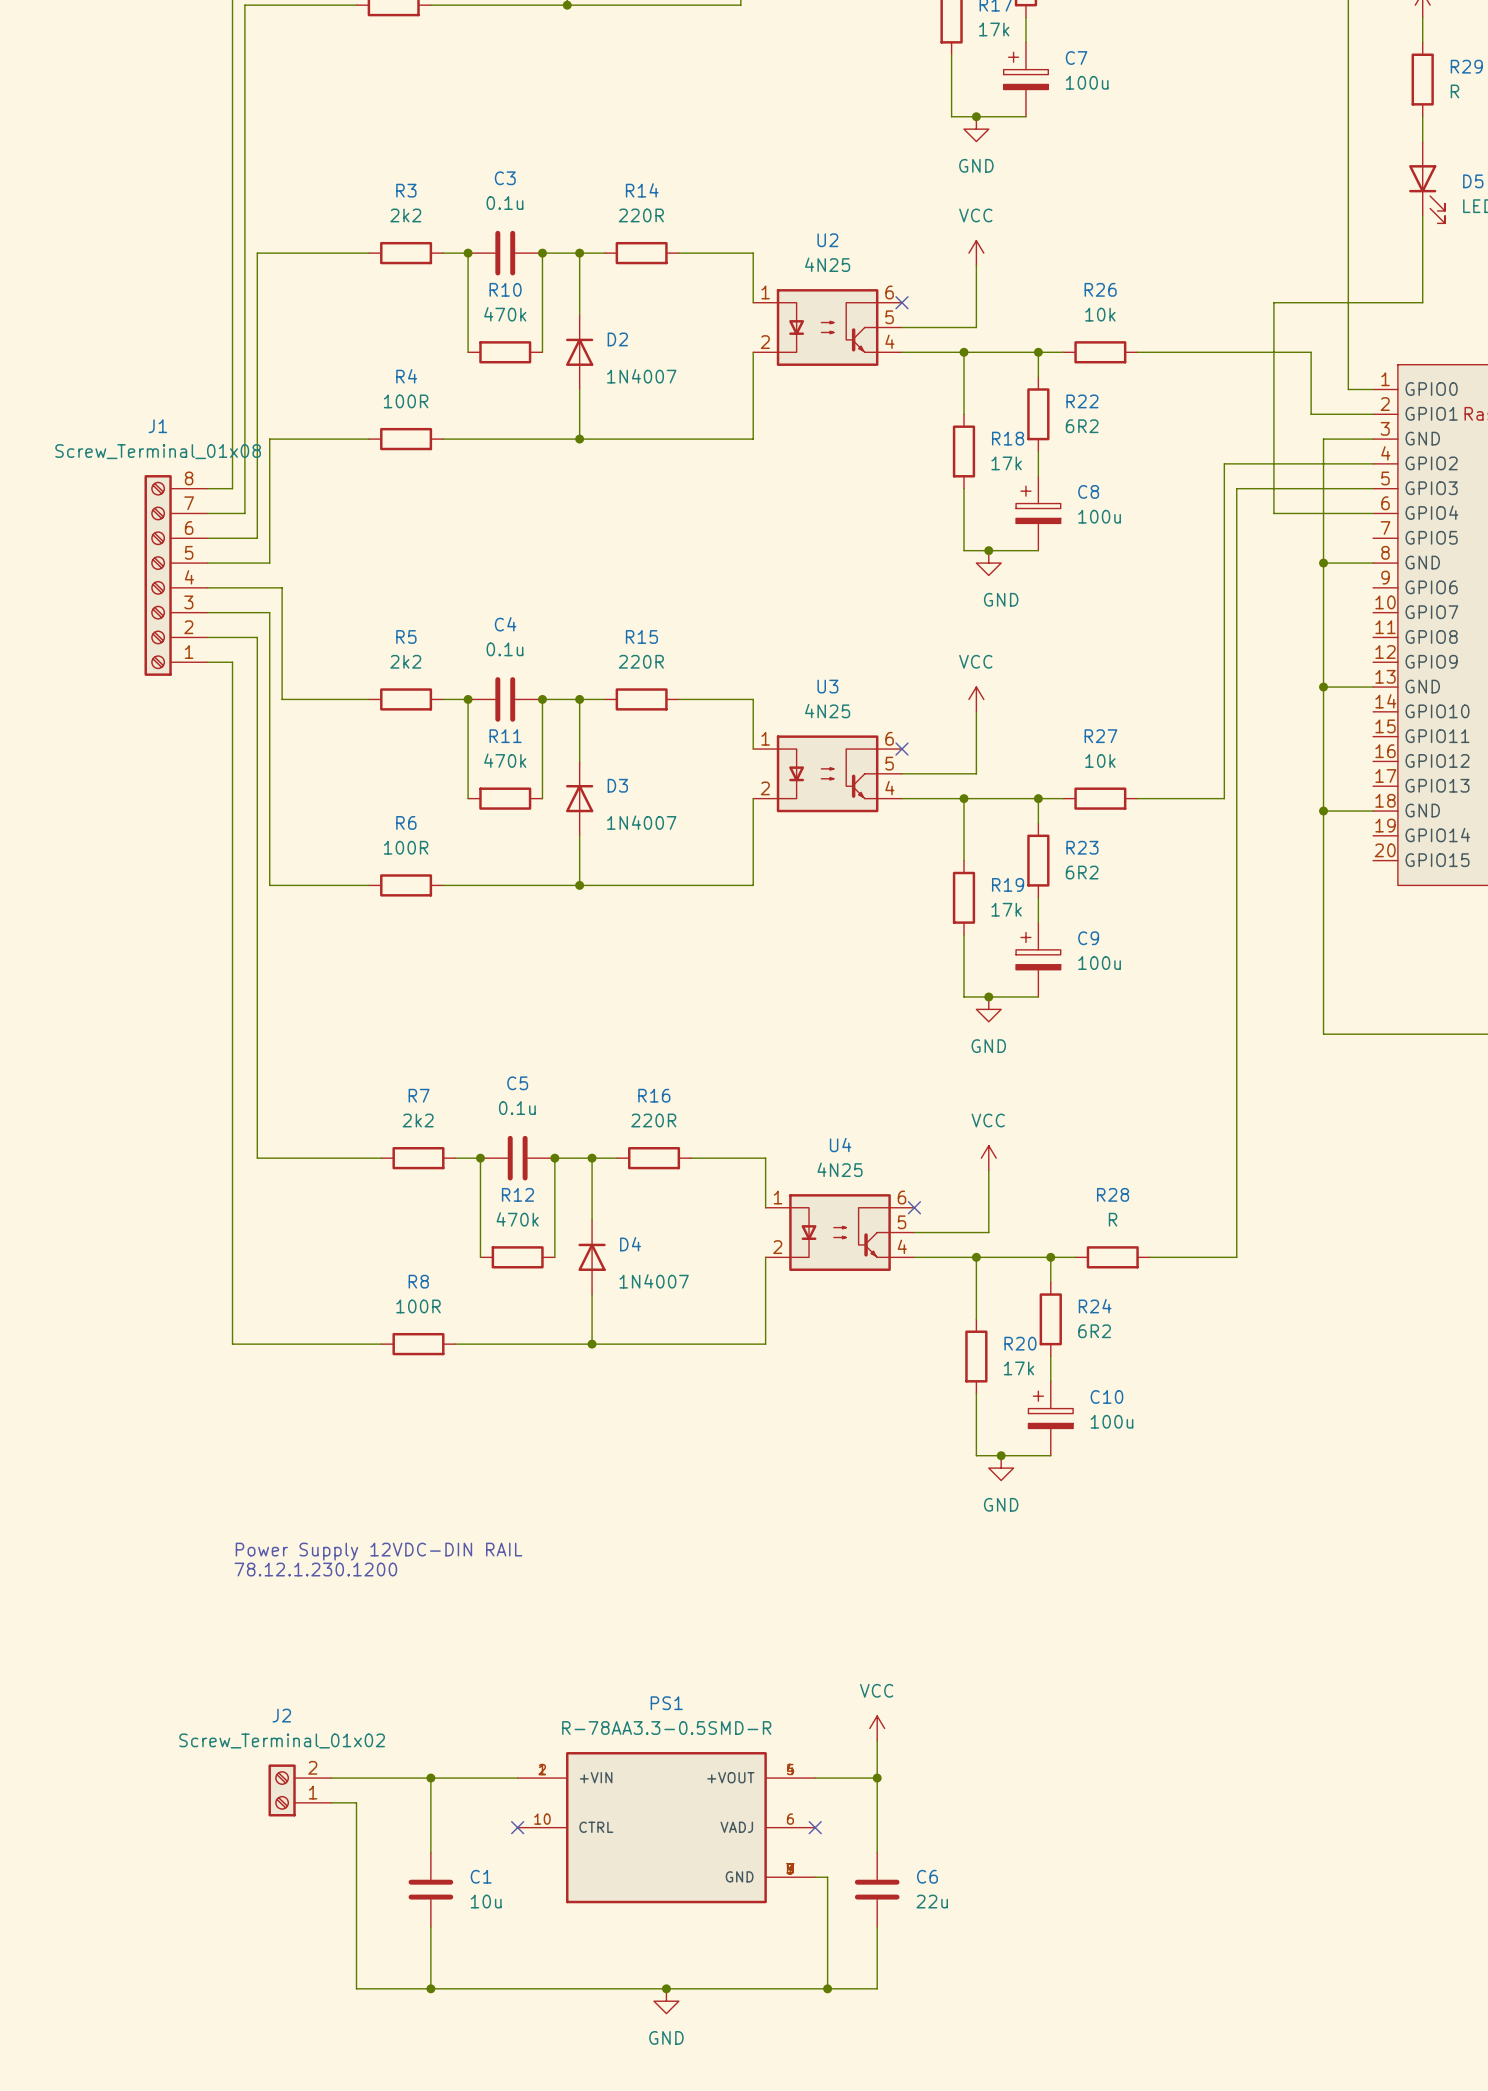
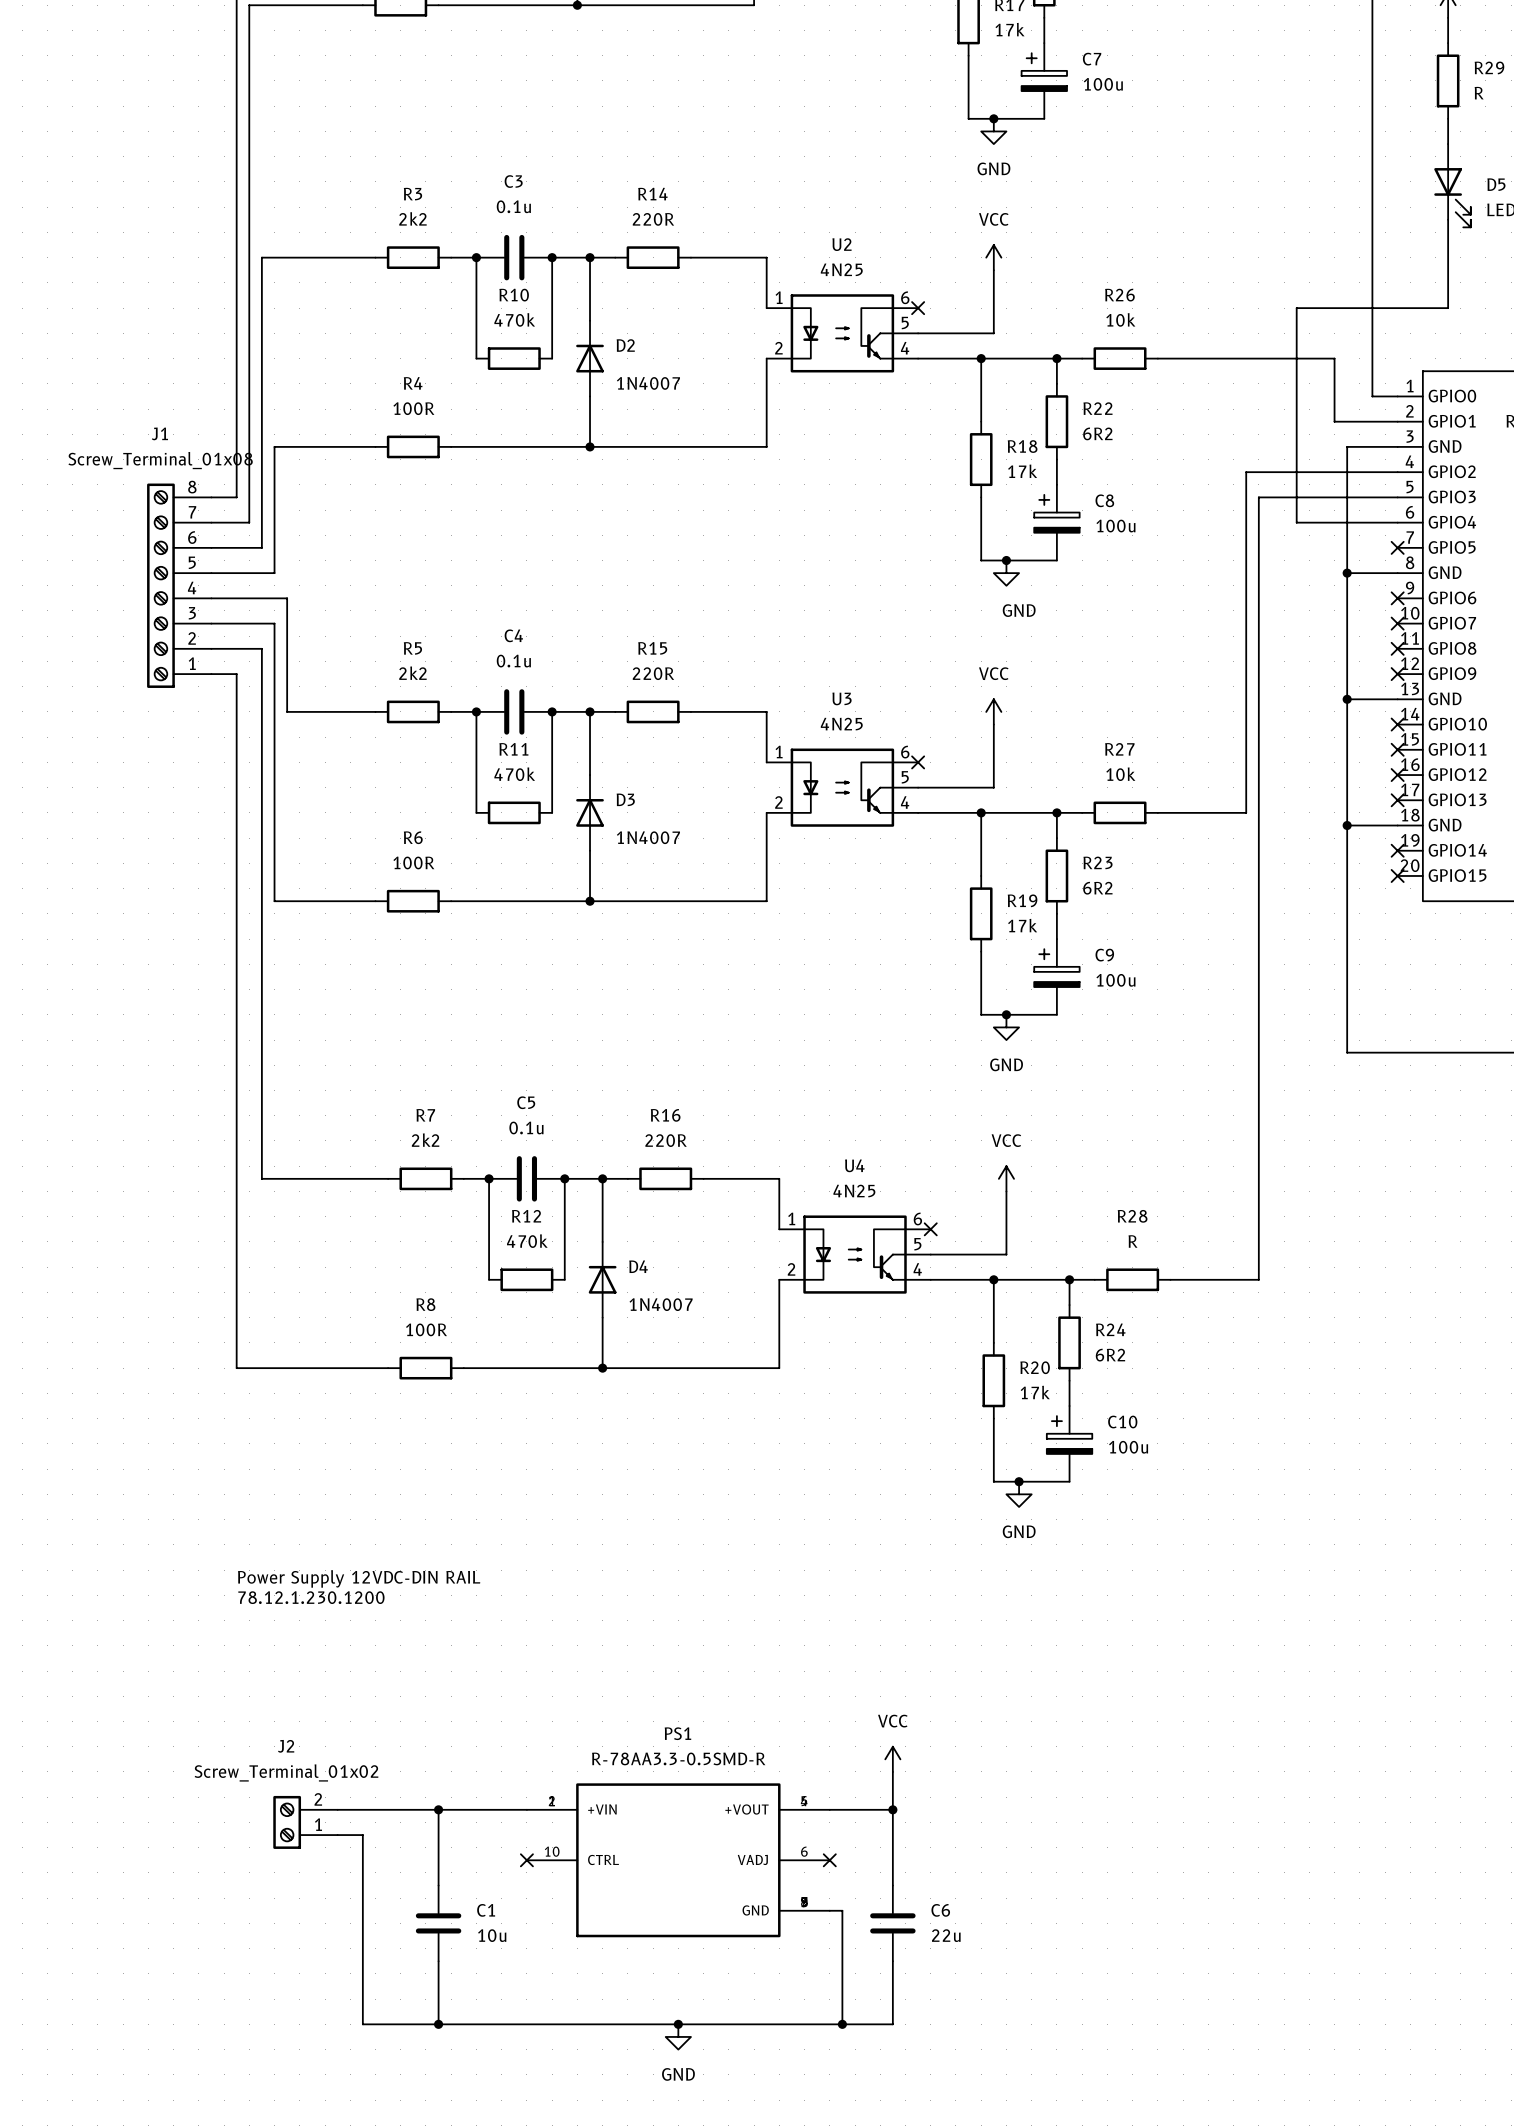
no-connect mark: none -> (1397, 547)
no-connect mark: none -> (1397, 598)
no-connect mark: none -> (1397, 623)
no-connect mark: none -> (1397, 648)
no-connect mark: none -> (1397, 674)
no-connect mark: none -> (1397, 724)
no-connect mark: none -> (1397, 749)
no-connect mark: none -> (1397, 775)
no-connect mark: none -> (1397, 800)
no-connect mark: none -> (1397, 850)
no-connect mark: none -> (1397, 875)

